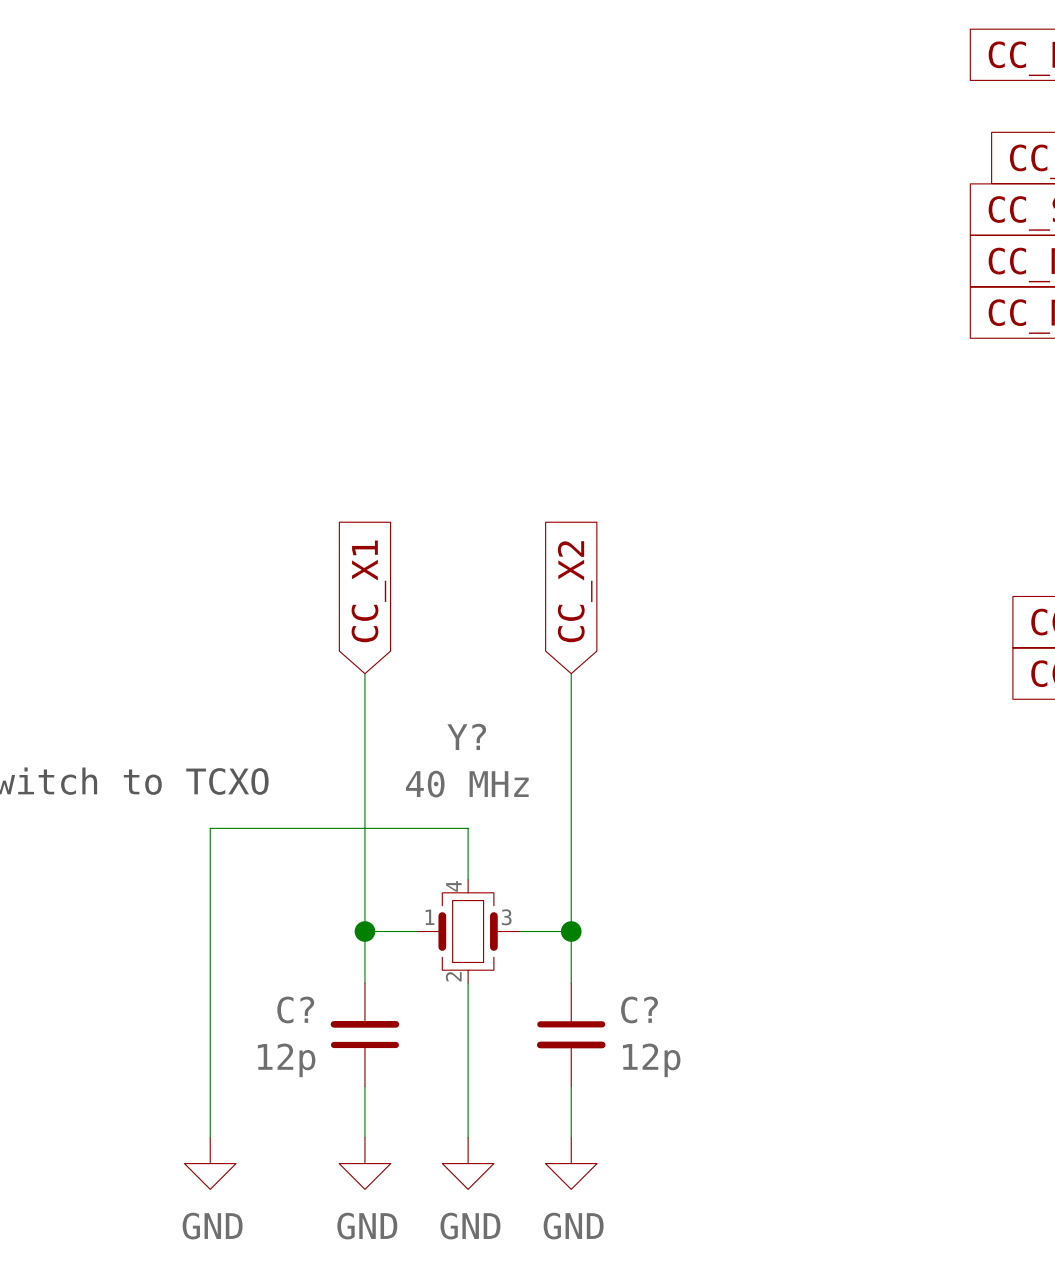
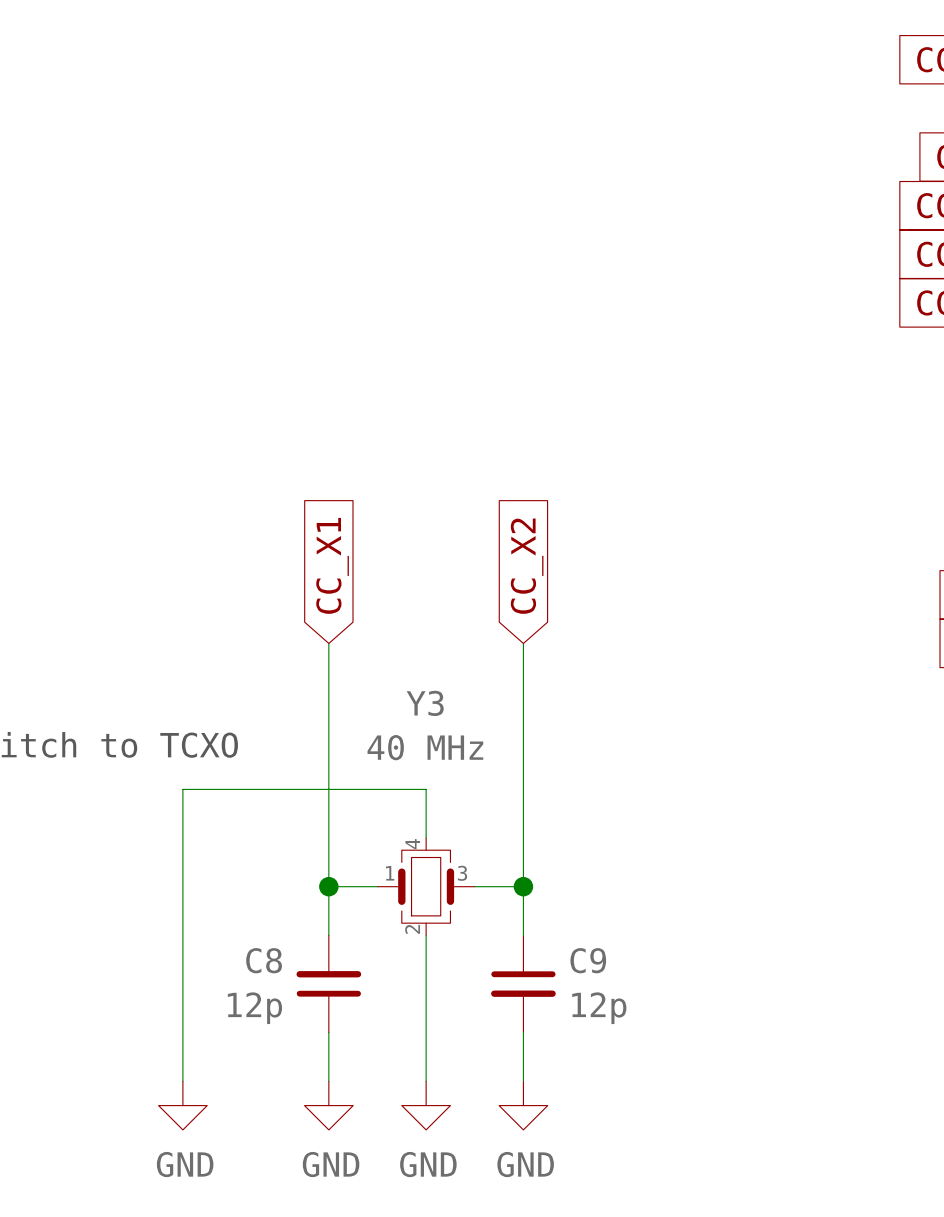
Y? name: Y? (466, 736) -> Y3 (425, 703)
C? name: C? (295, 1009) -> C8 (264, 960)
C? name: C? (639, 1009) -> C9 (588, 960)

